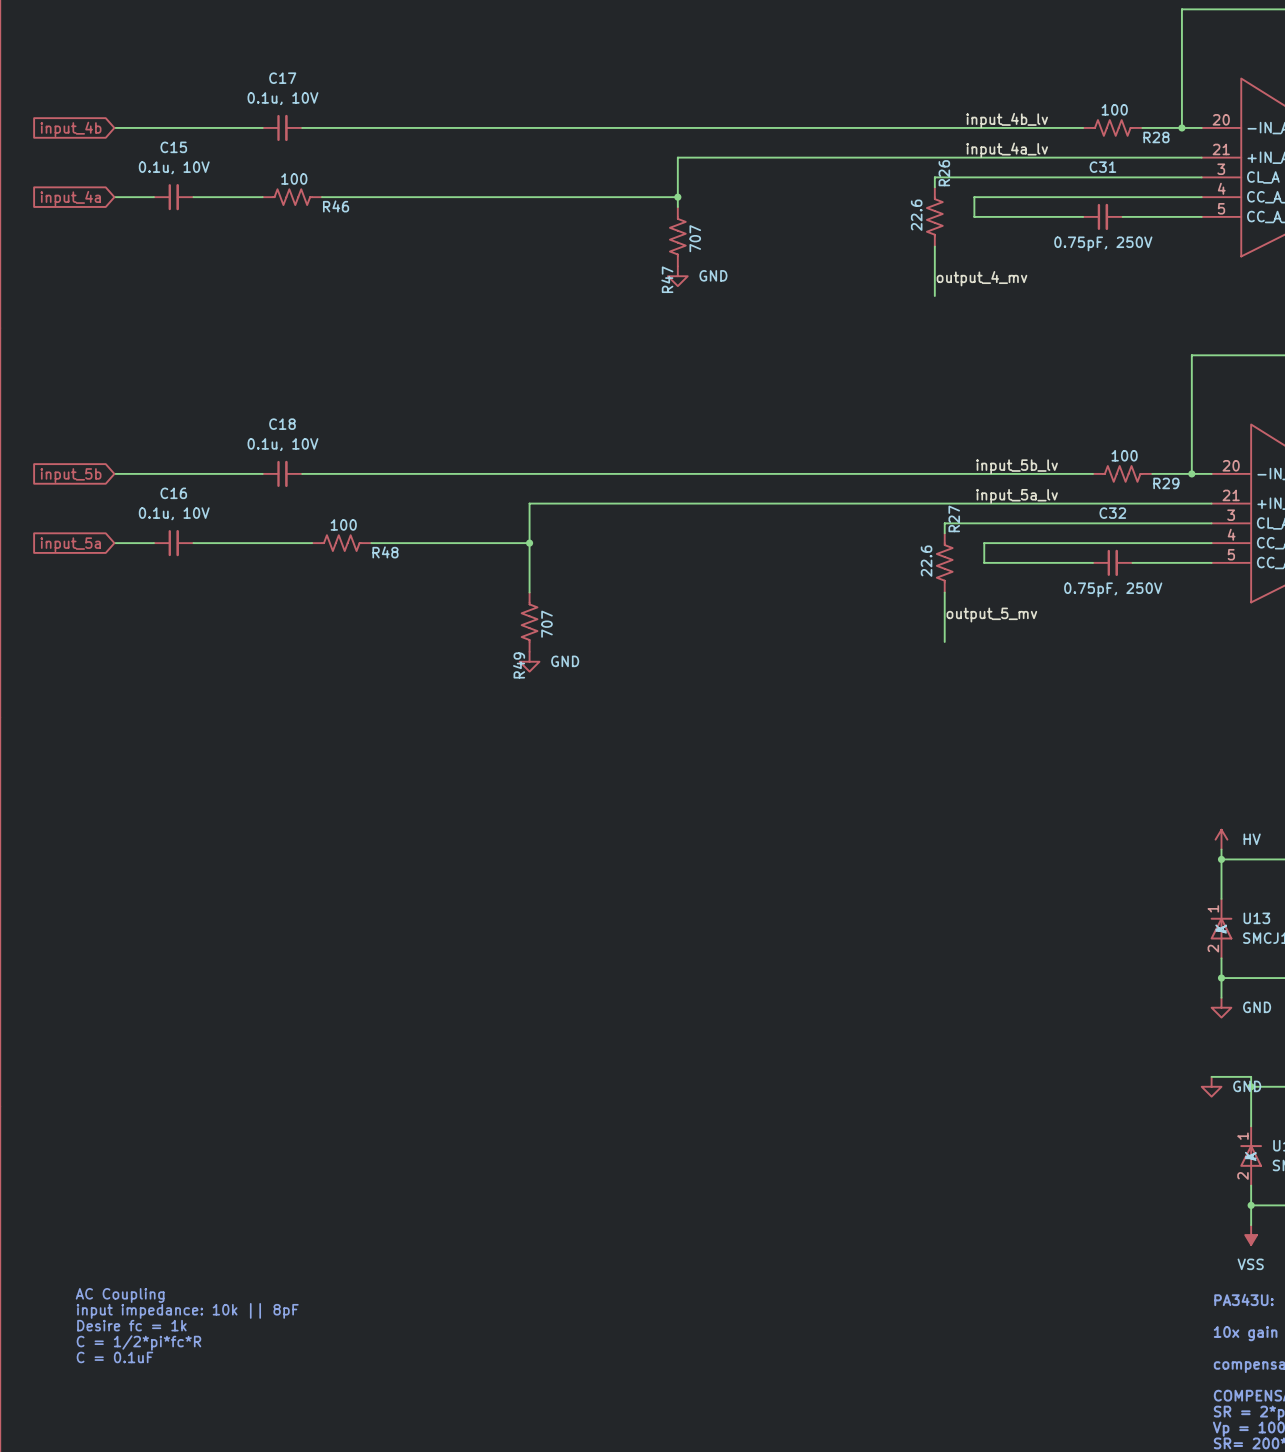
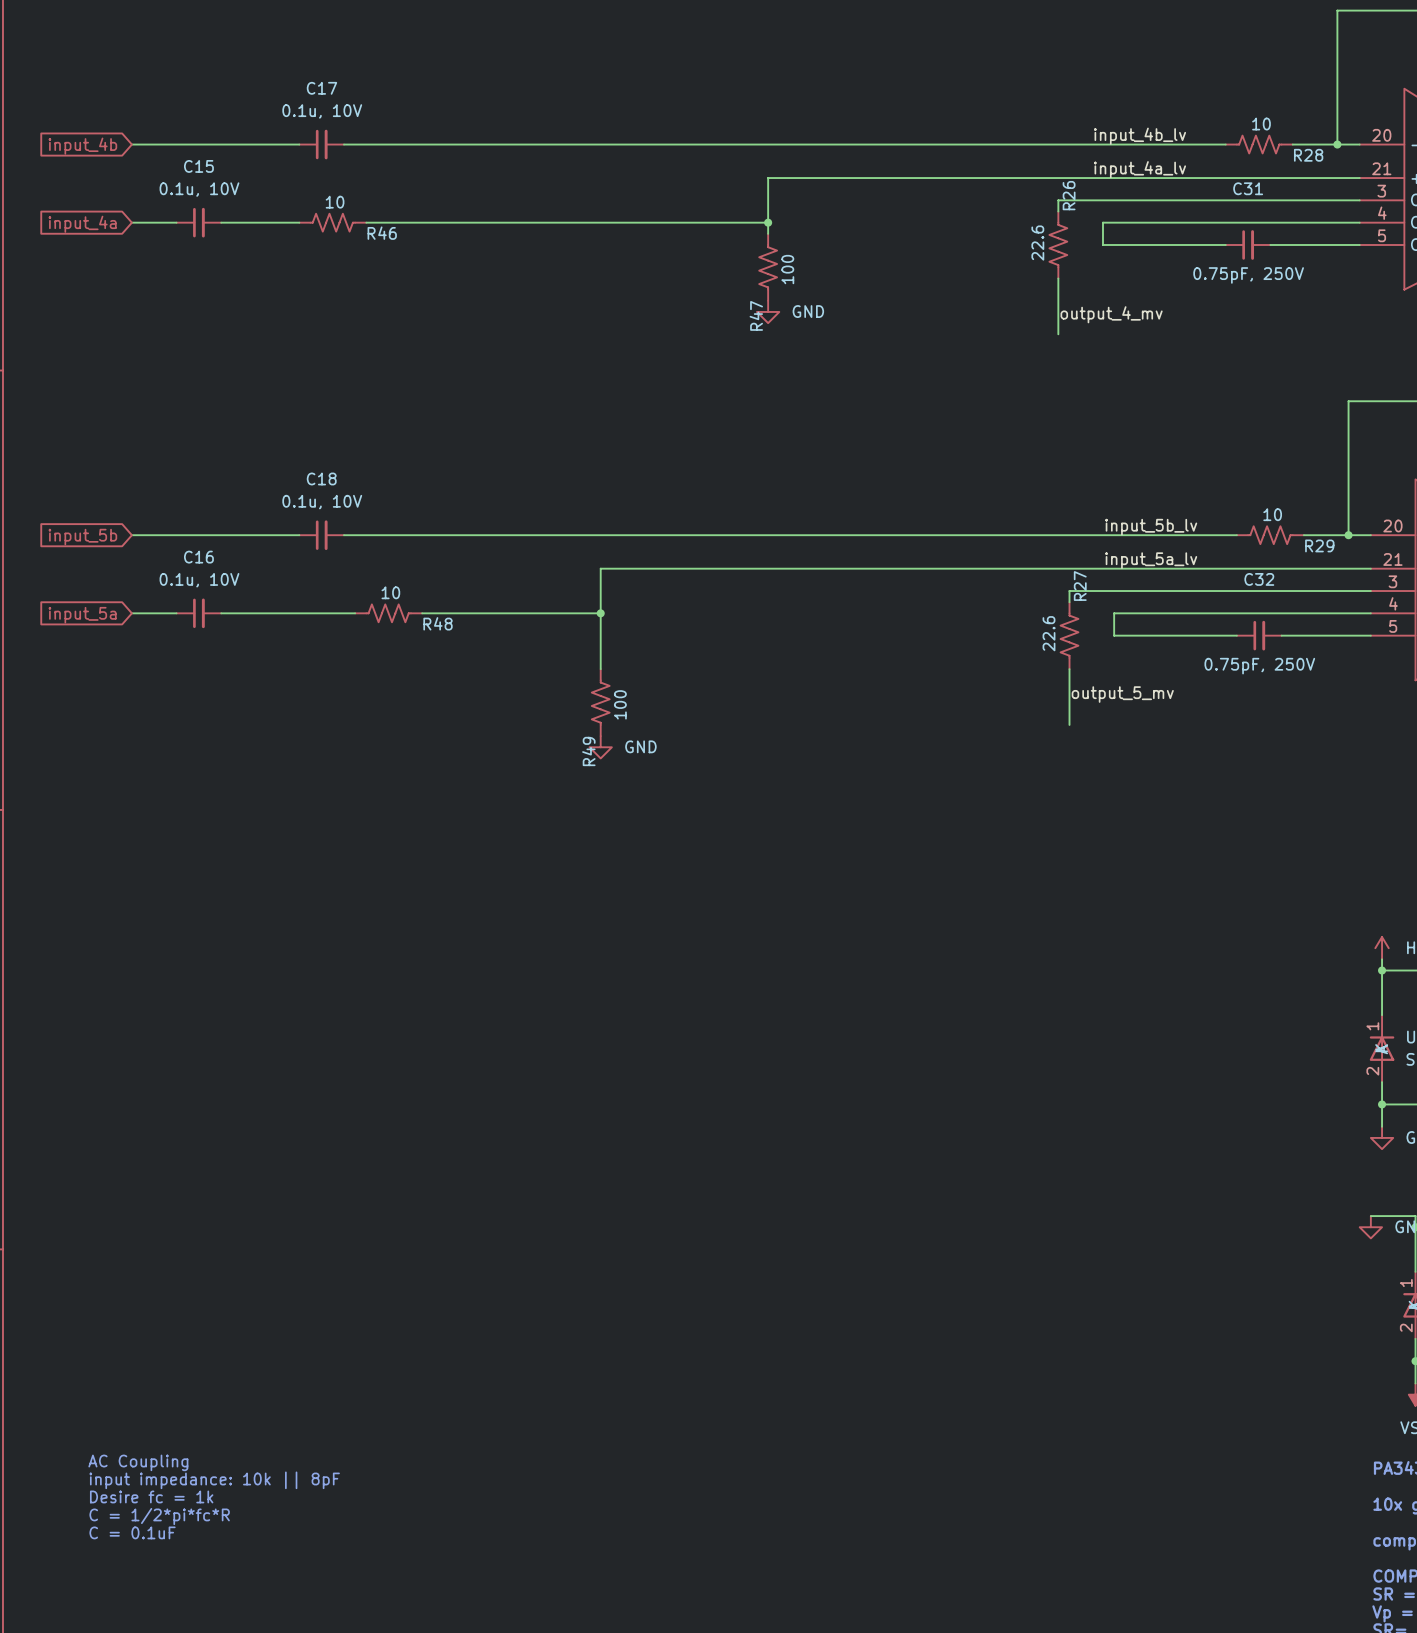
R28 value: 100 (1114, 109) -> 10 (1261, 124)
R46 value: 100 (294, 178) -> 10 (335, 202)
R47 value: 707 (695, 238) -> 100 (787, 269)
R29 value: 100 (1124, 455) -> 10 (1272, 514)
R48 value: 100 (343, 524) -> 10 (390, 592)
R49 value: 707 (546, 624) -> 100 (620, 704)

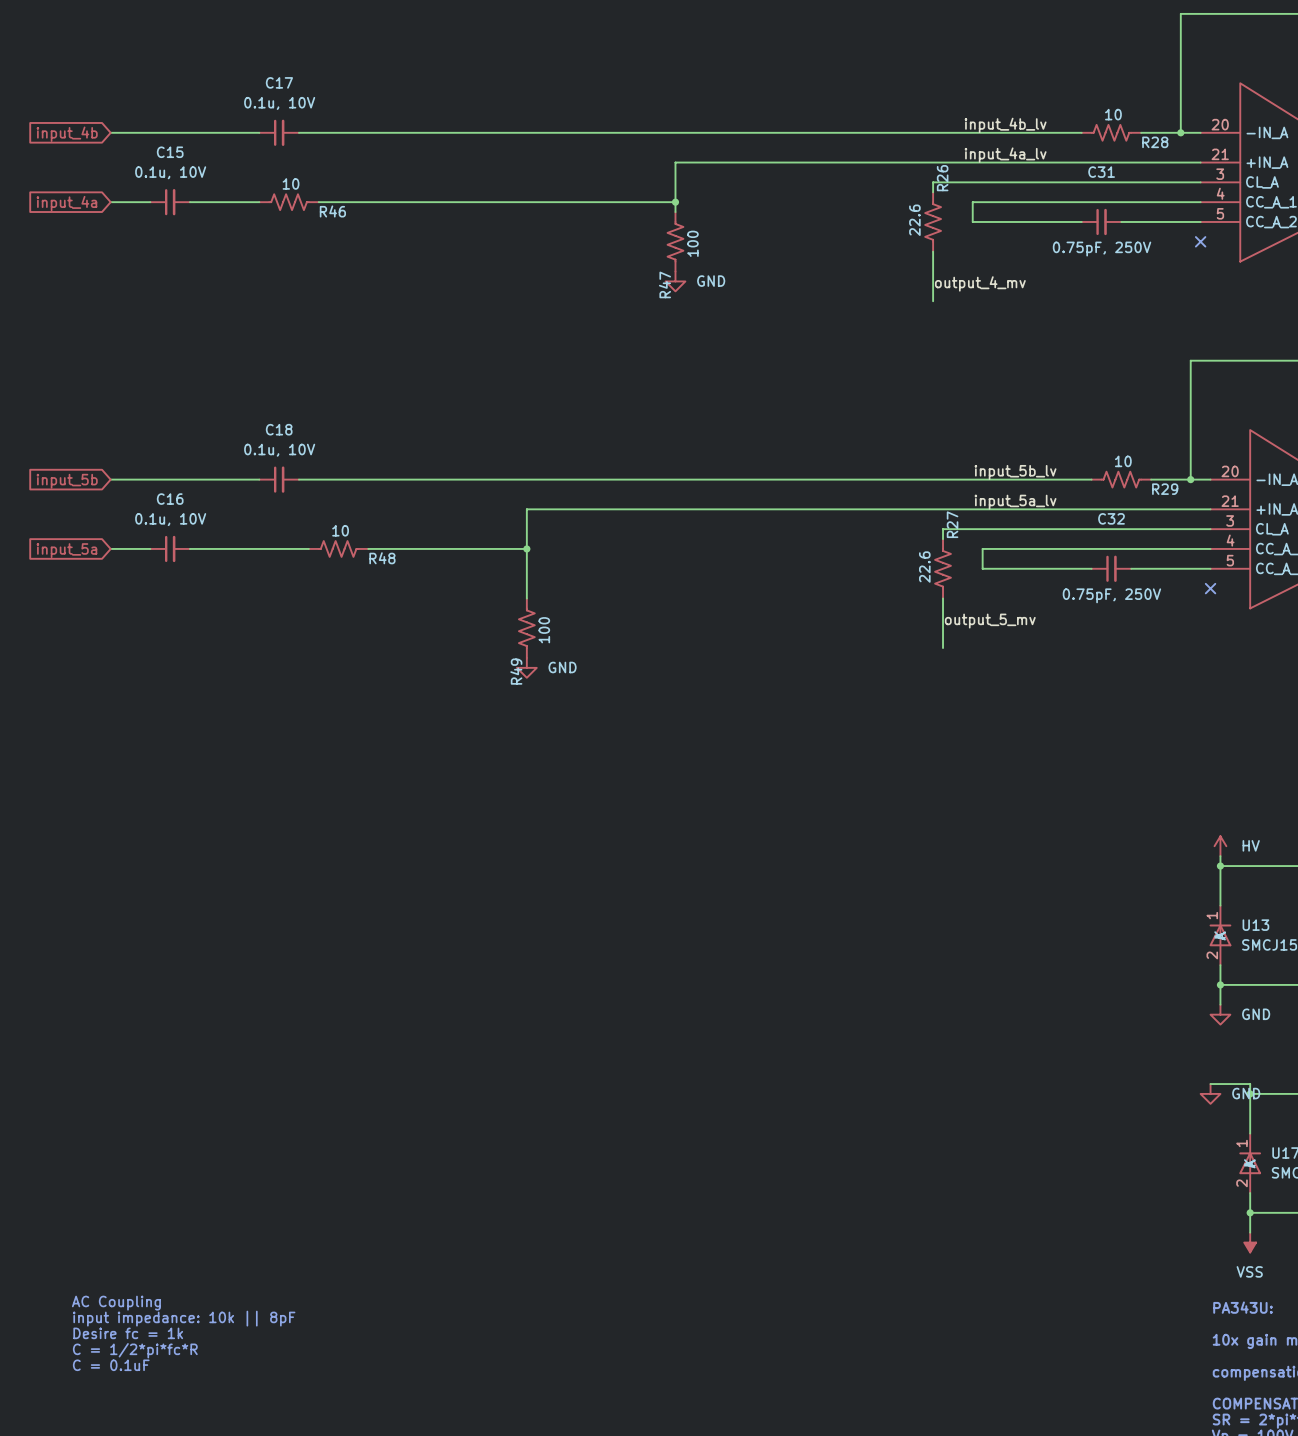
no-connect mark: none -> (1200, 241)
no-connect mark: none -> (1210, 588)

